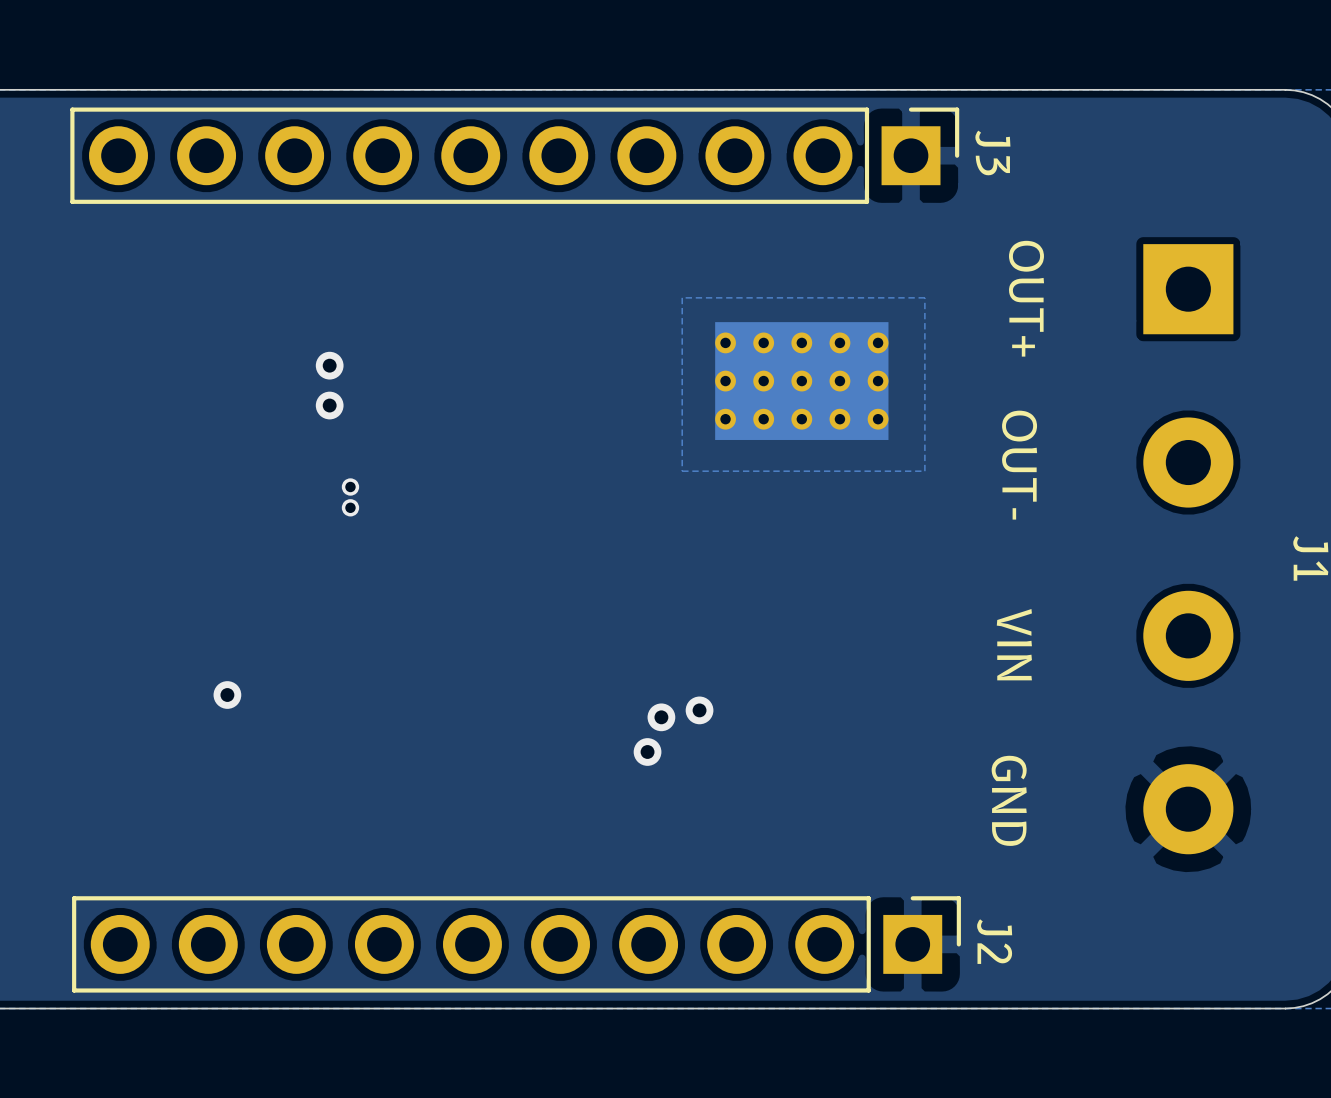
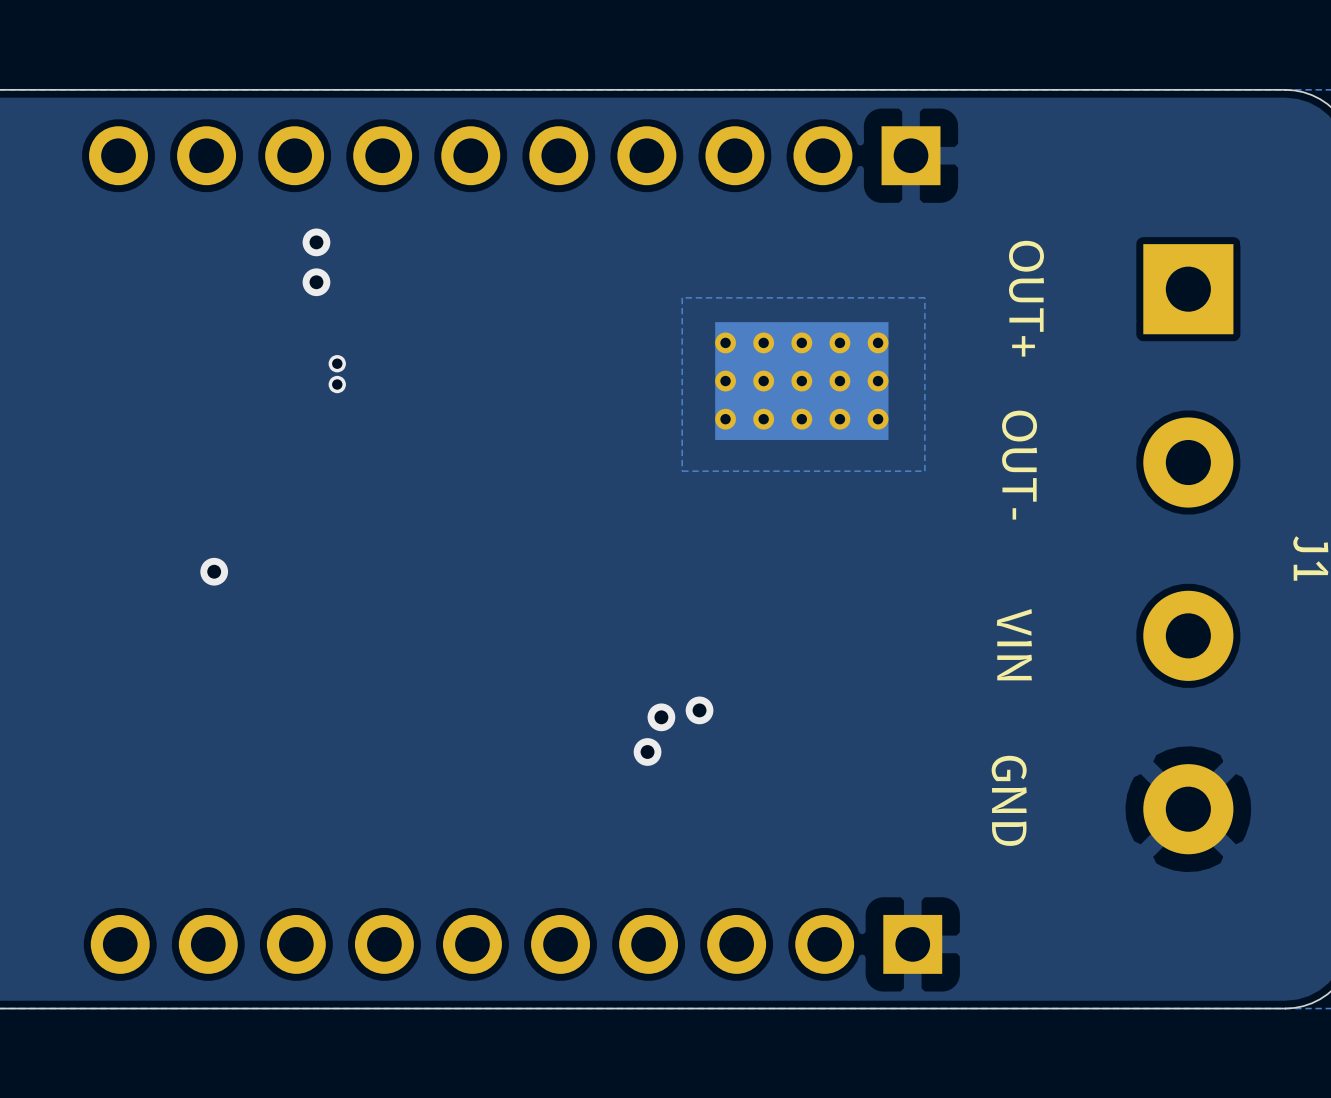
J3 side: bottom (514, 155) -> top (514, 155)
via: none -> (316, 242)
via: none -> (316, 282)
via size: [315, 351, 344, 380] -> [328, 355, 346, 373]
via: none -> (337, 384)
via: (329, 405) -> none
via: (350, 487) -> none
via: (350, 507) -> none
via: none -> (214, 571)
via: (227, 695) -> none
J2 side: bottom (516, 944) -> top (516, 944)

